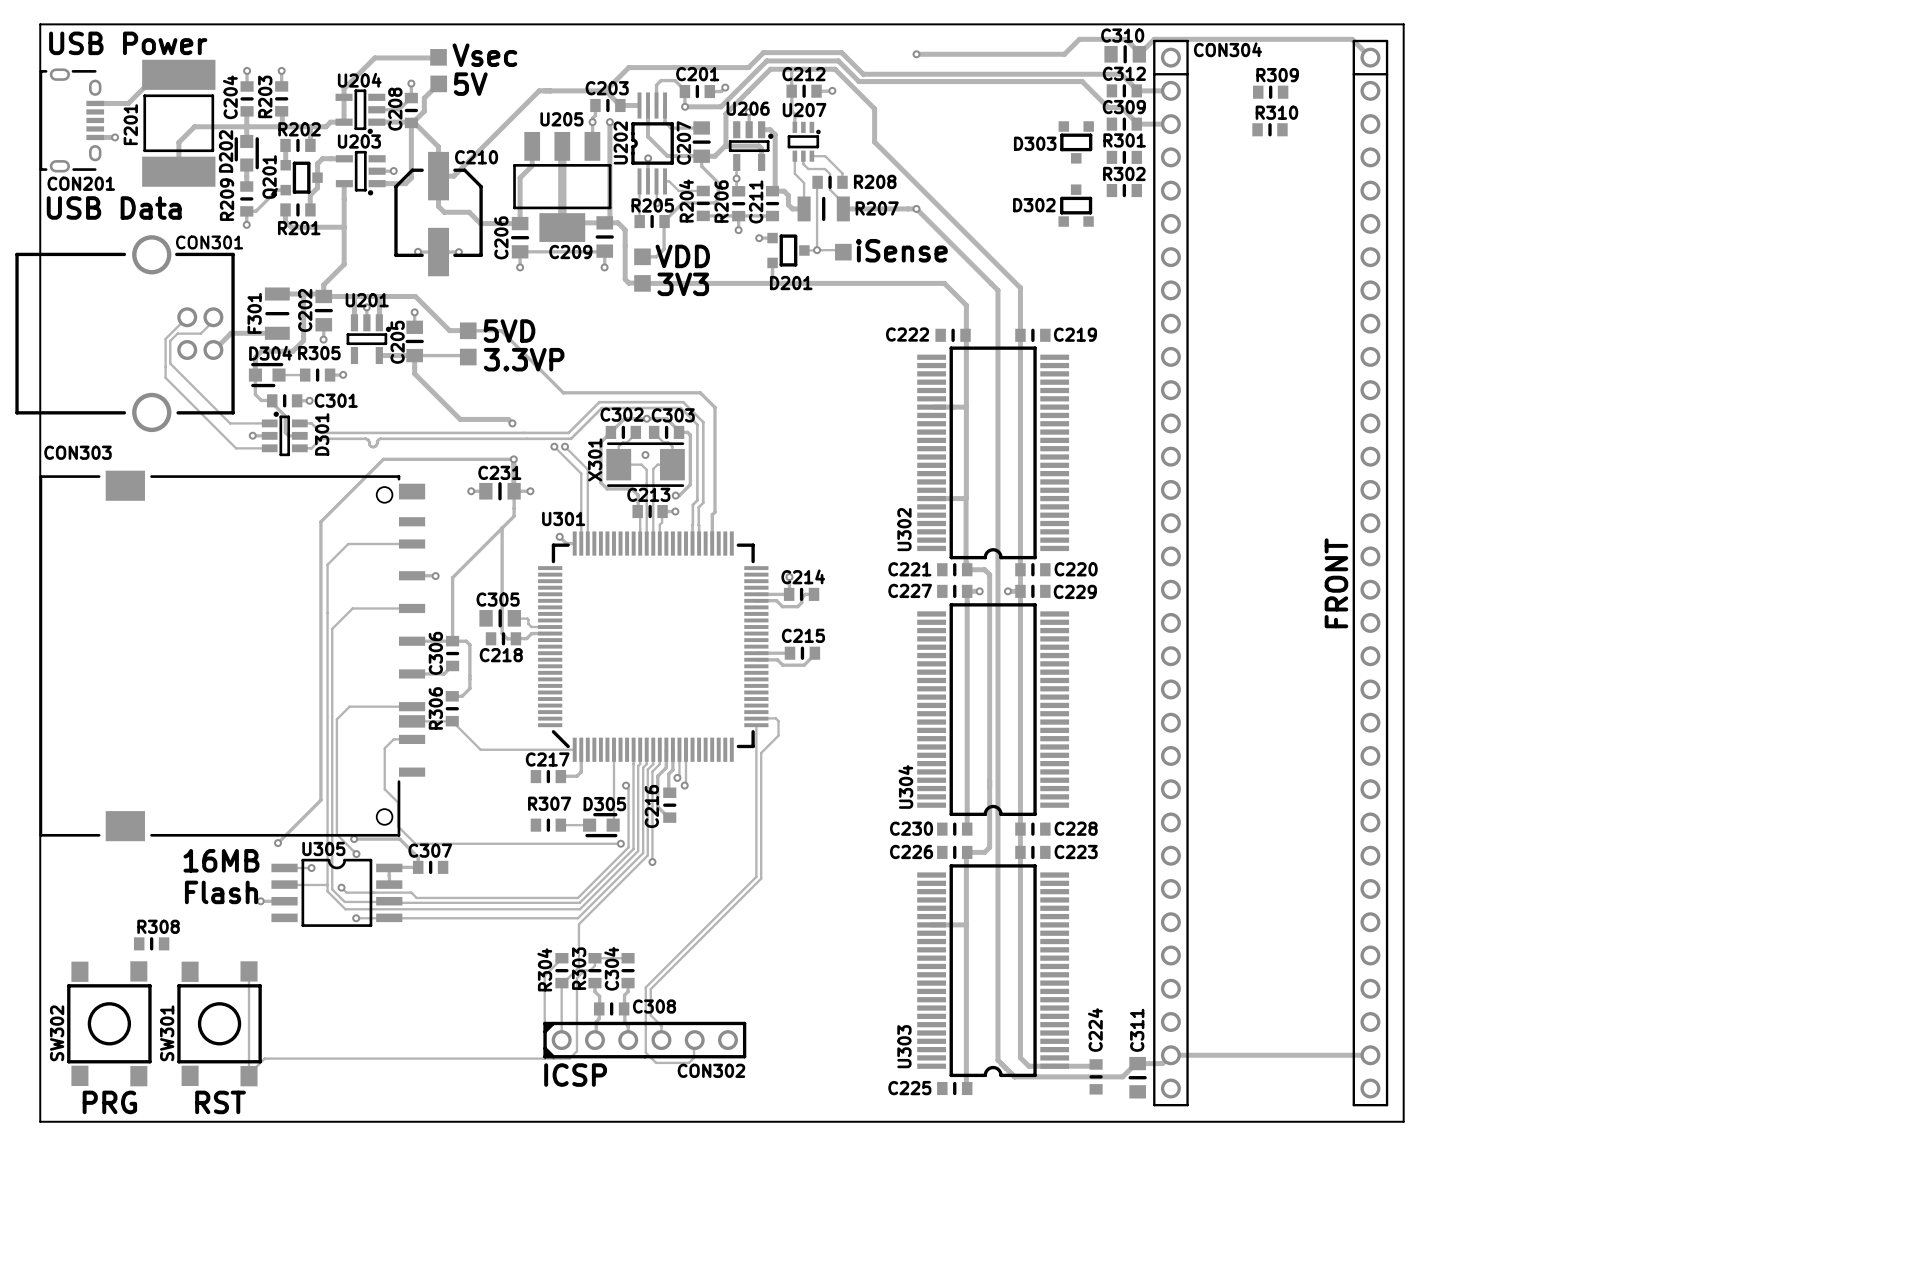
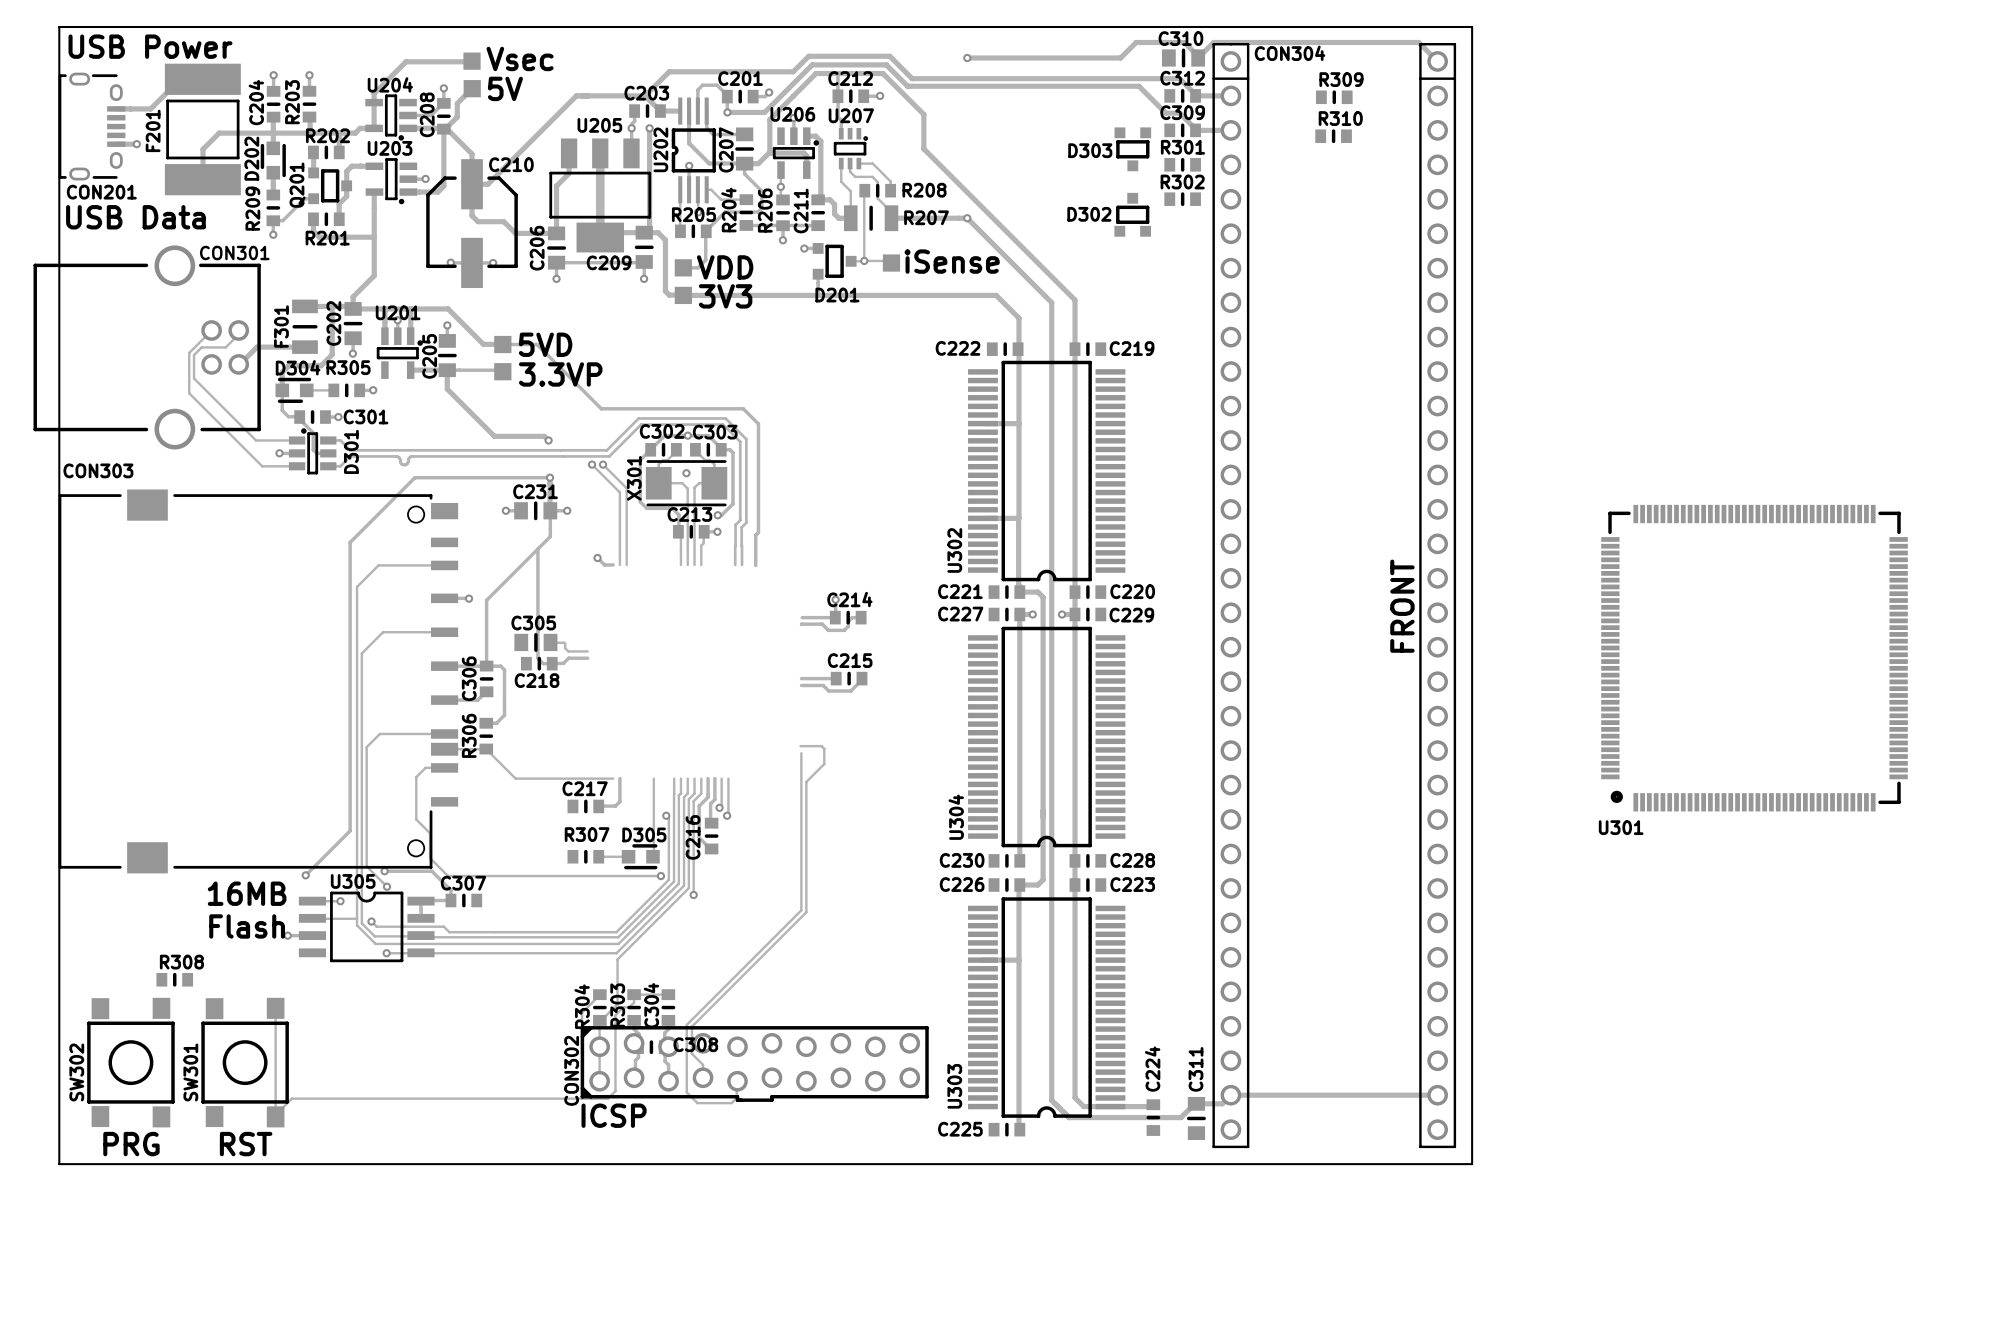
U301 name position: U301 (563, 518) -> U301 (1621, 827)
U301 footprint: [538, 531, 769, 762] -> [1601, 504, 1908, 812]
CON302 footprint: [543, 1021, 747, 1059] -> [580, 1026, 929, 1102]
CON302 name position: CON302 (711, 1070) -> CON302 (571, 1070)

